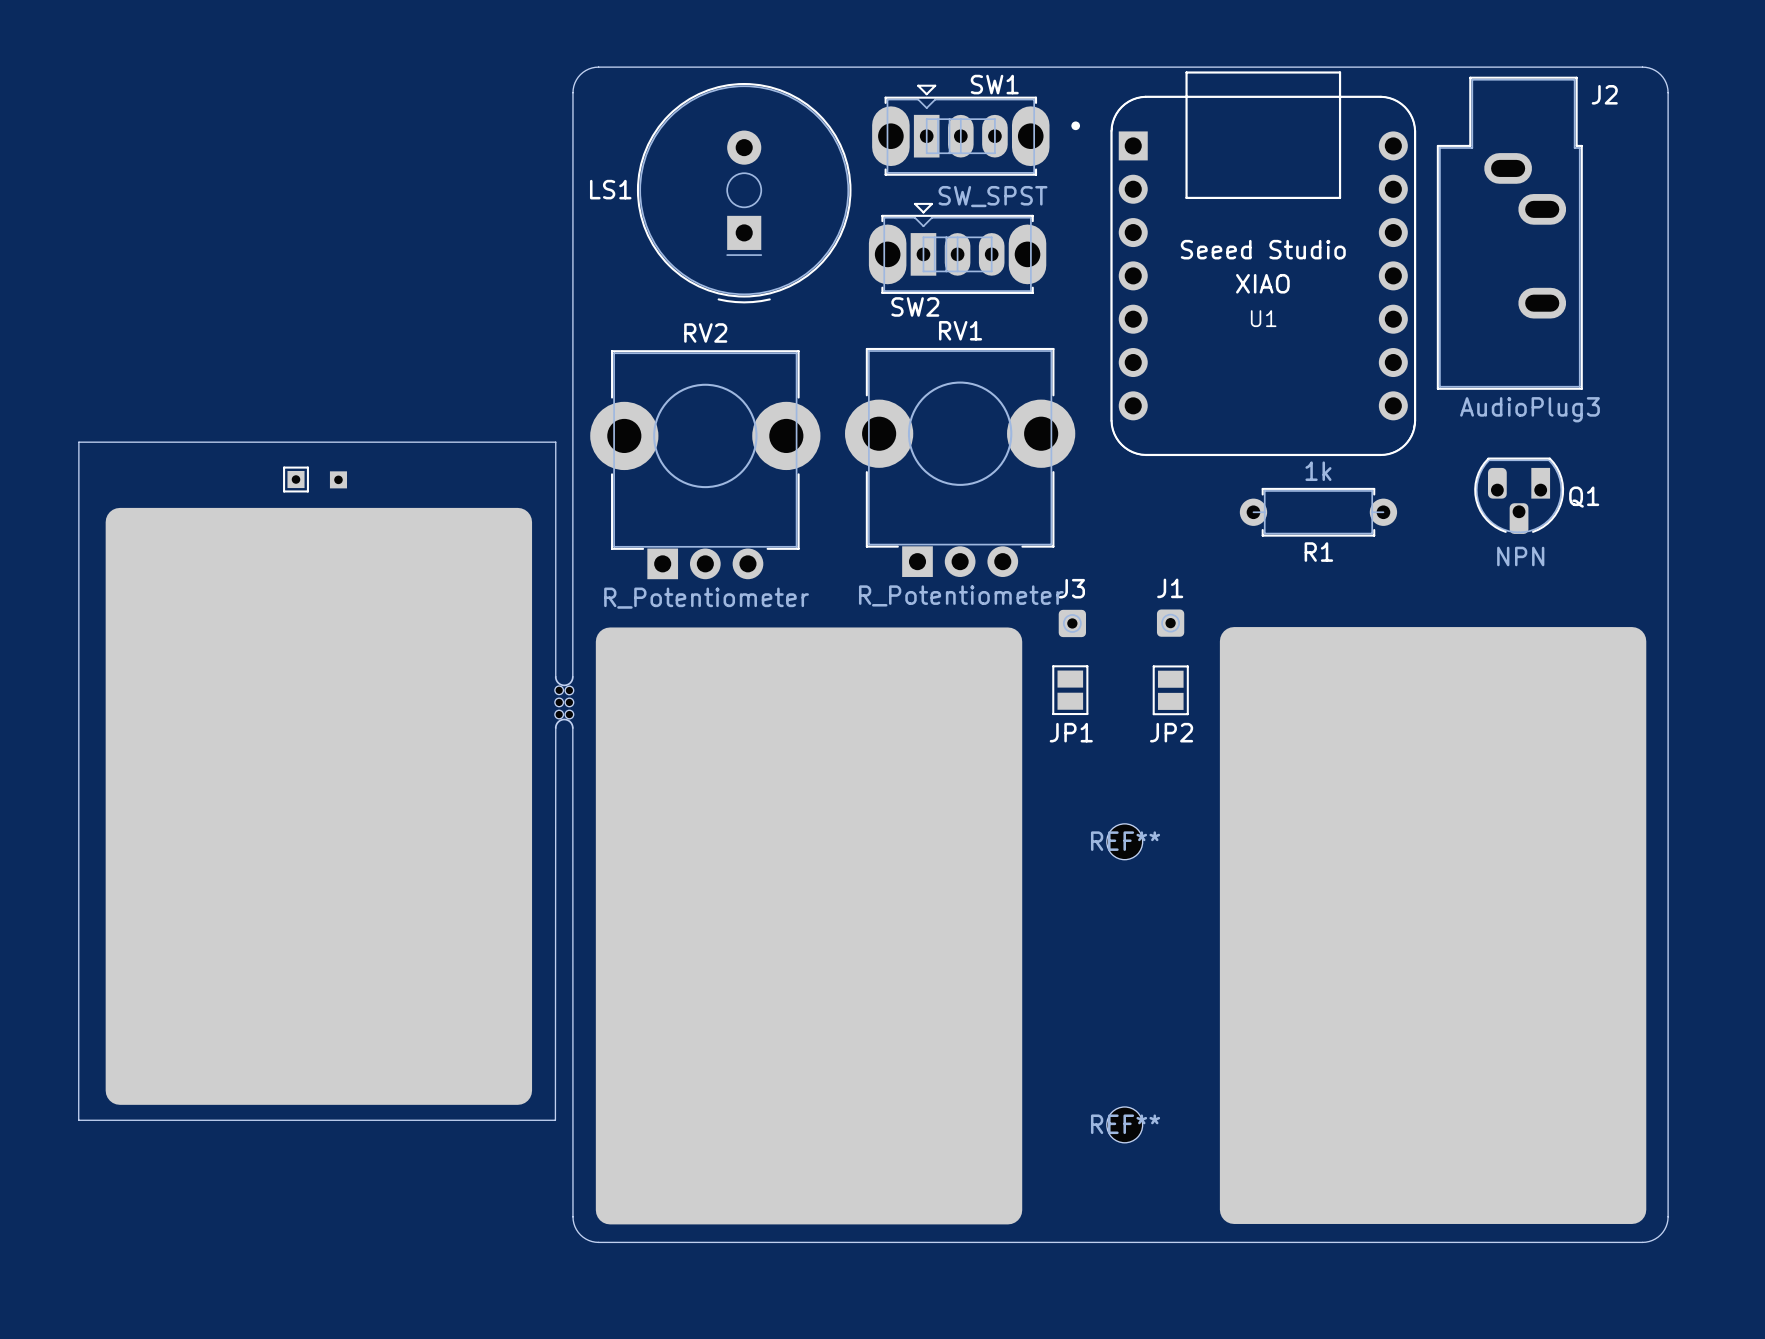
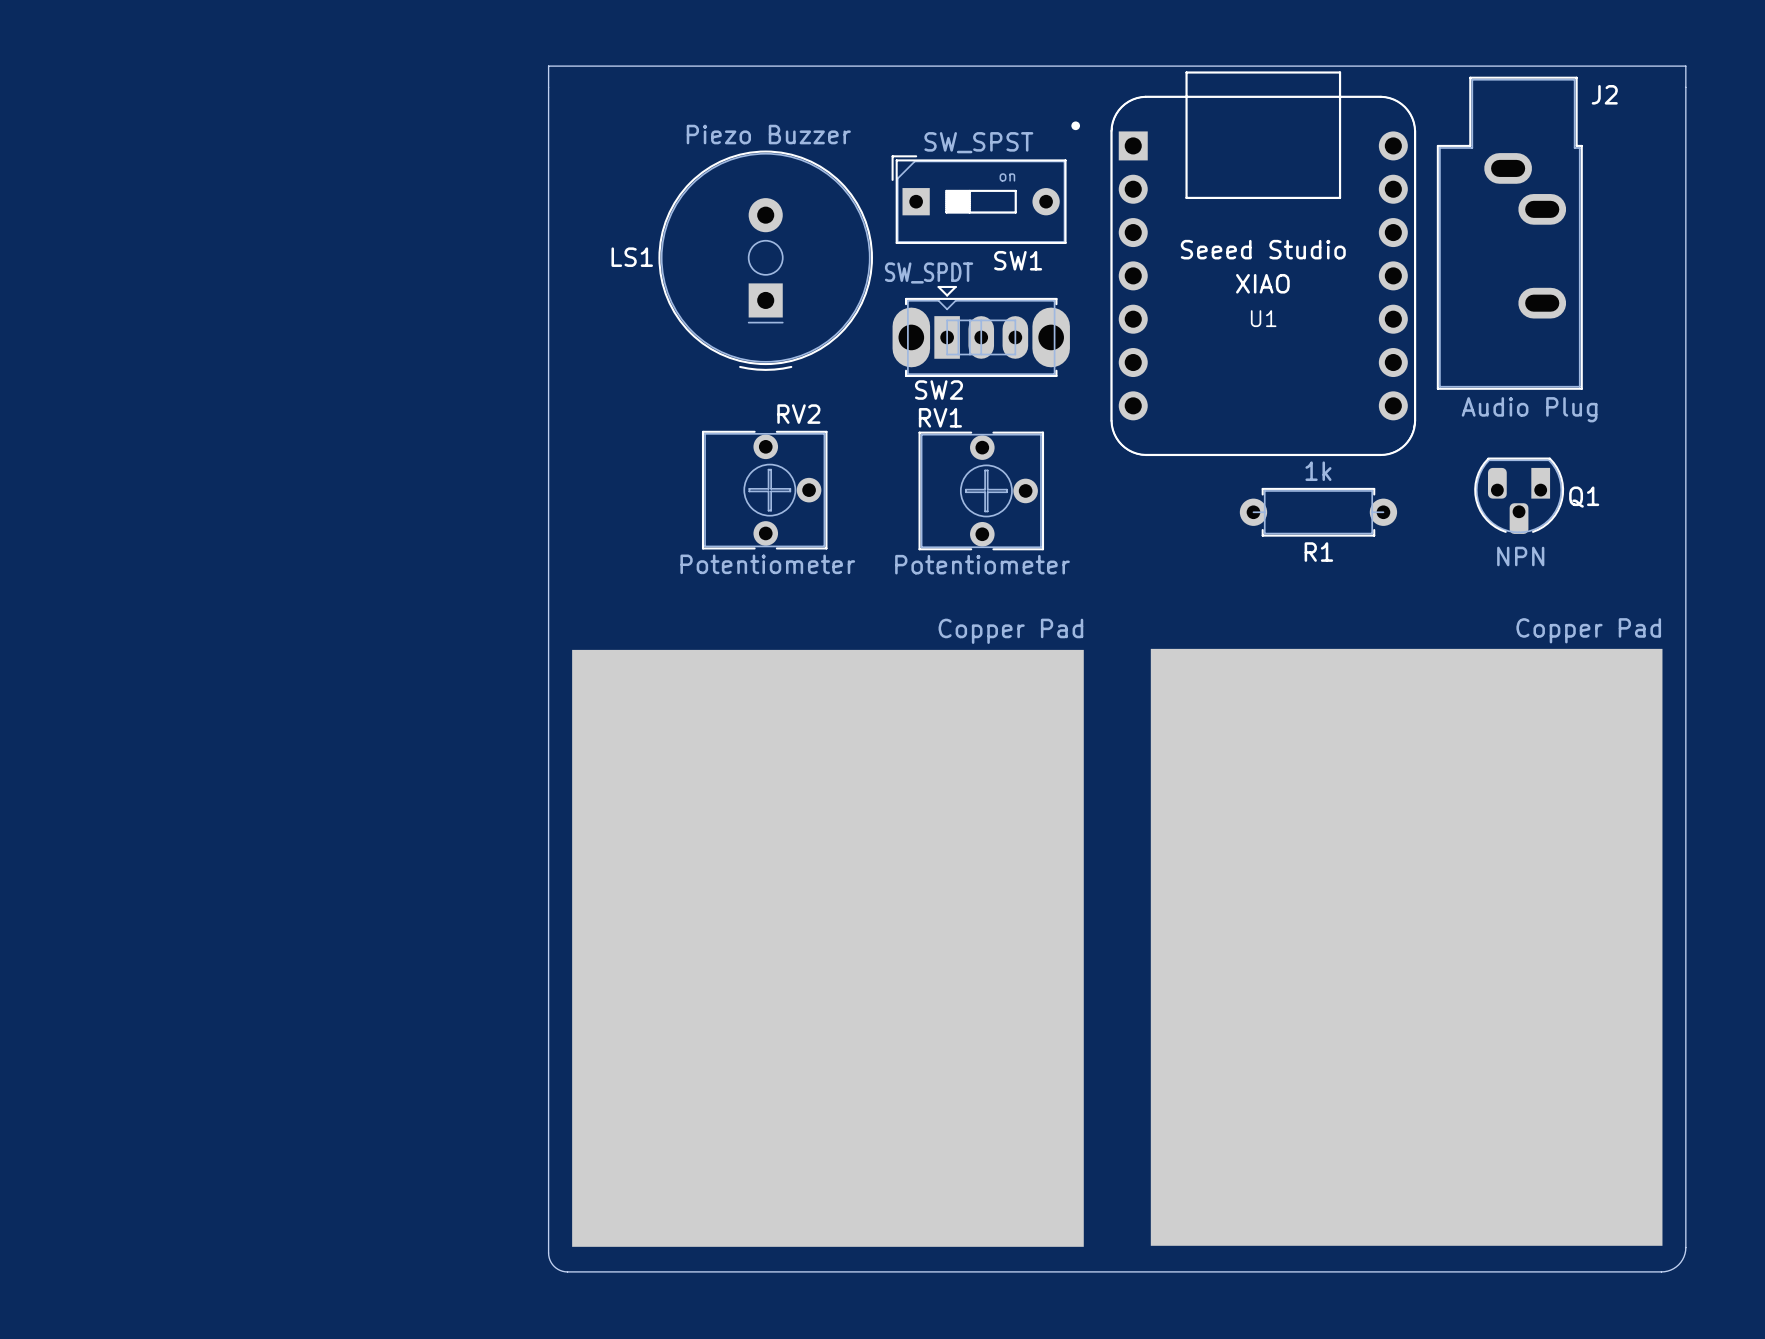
board edge: none -> (548, 66) (548, 1253) (554, 1266) (567, 1271) (1661, 1271) (1670, 1270) (1678, 1264) (1683, 1256) (1685, 1247) (1685, 66) (548, 66)
SW1 footprint: [872, 84, 1050, 176] -> [891, 155, 1067, 244]
SW1 name position: SW1 (994, 84) -> SW1 (1018, 260)
LS1 value: none -> Piezo Buzzer (768, 134)
LS1 position: (744, 193) -> (765, 260)
SW1 value position: SW_SPST (993, 196) -> SW_SPST (978, 142)
SW2 position: (957, 248) -> (981, 331)
SW2 value: none -> SW_SPDT (929, 272)
RV1 name position: RV1 (960, 330) -> RV1 (940, 417)
RV2 name position: RV2 (705, 332) -> RV2 (798, 414)
RV1 footprint: [845, 347, 1076, 577] -> [918, 431, 1045, 551]
RV2 footprint: [590, 350, 821, 580] -> [701, 430, 828, 550]
J2 value: AudioPlug3 (1529, 409) -> Audio Plug (1529, 409)
part: (296, 479) -> none
part: (338, 479) -> none
RV1 value: R_Potentiometer (961, 595) -> Potentiometer (982, 564)
RV2 value: R_Potentiometer (706, 598) -> Potentiometer (767, 564)
J3: (1072, 623) -> none
J1: (1170, 623) -> none
board edge: (555, 676) (555, 442) (78, 442) (78, 1120) (555, 1120) (555, 728) -> none
board edge: (572, 676) (572, 92) (576, 79) (585, 70) (598, 67) (1642, 67) (1655, 70) (1664, 79) (1668, 92) (1668, 1216) (1664, 1229) (1655, 1238) (1642, 1242) (598, 1242) (588, 1240) (578, 1232) (572, 1216) (572, 728) -> none
JP1: (1070, 690) -> none
JP2: (1170, 690) -> none
part: (564, 702) -> none
part: (318, 806) -> none
REF**: (1124, 841) -> none
part: (809, 925) -> none
part: (1433, 925) -> none
part: none -> Copper Pad (1406, 947)
part: none -> Copper Pad (827, 948)
REF**: (1124, 1124) -> none

